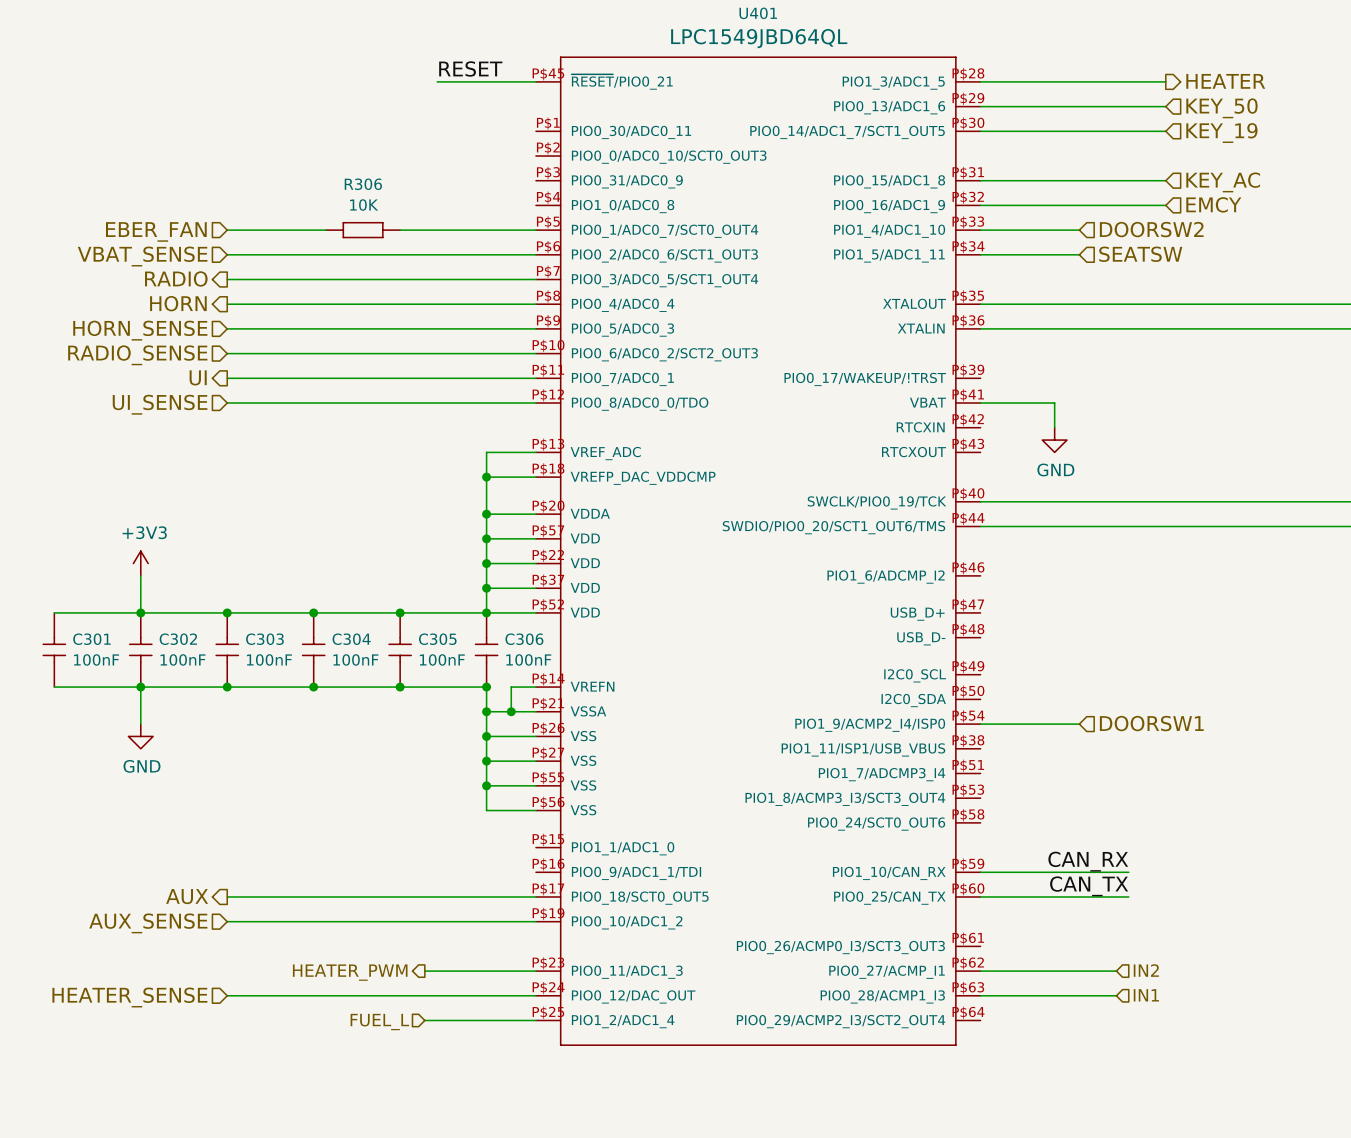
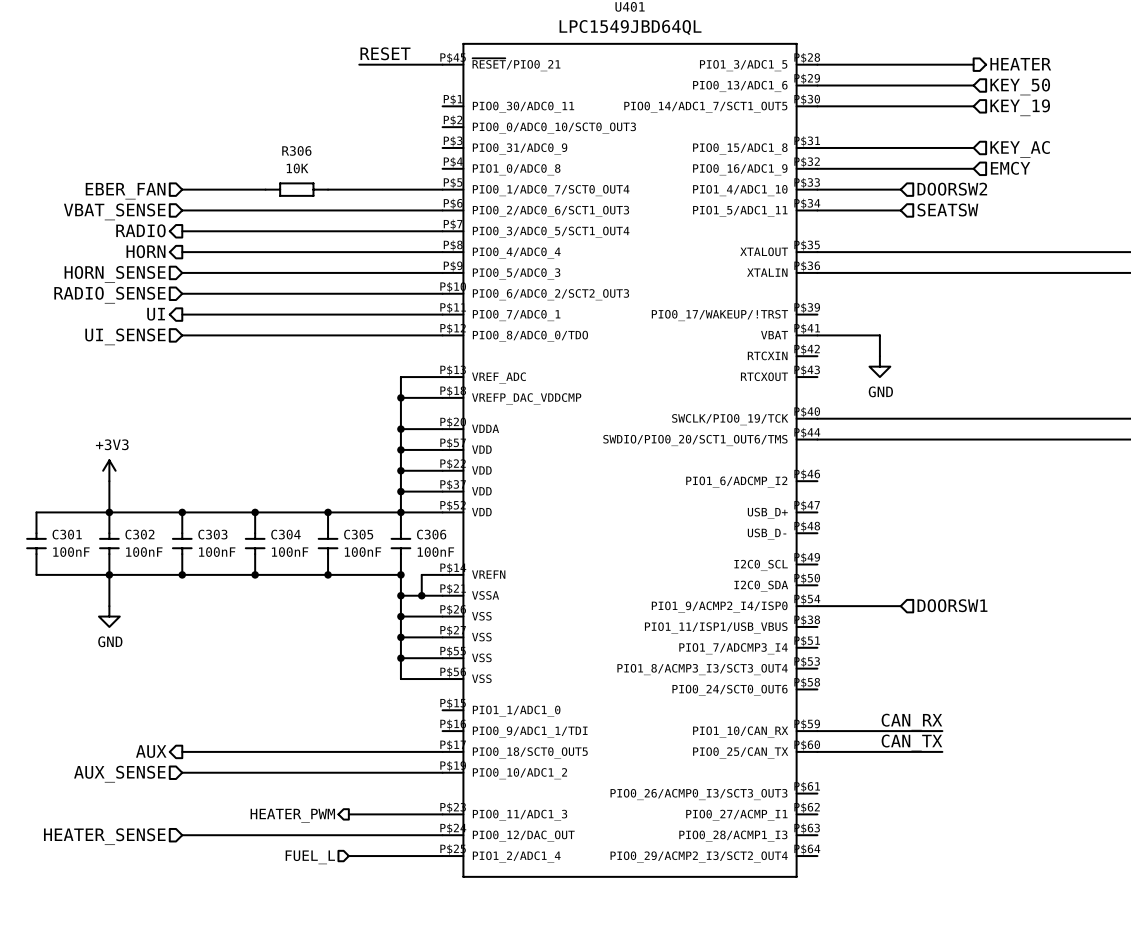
hierarchical label: IN2 (1146, 970) -> none
wire: (980, 971) (1116, 971) -> none
wire: (980, 995) (1116, 995) -> none
hierarchical label: IN1 (1146, 995) -> none

